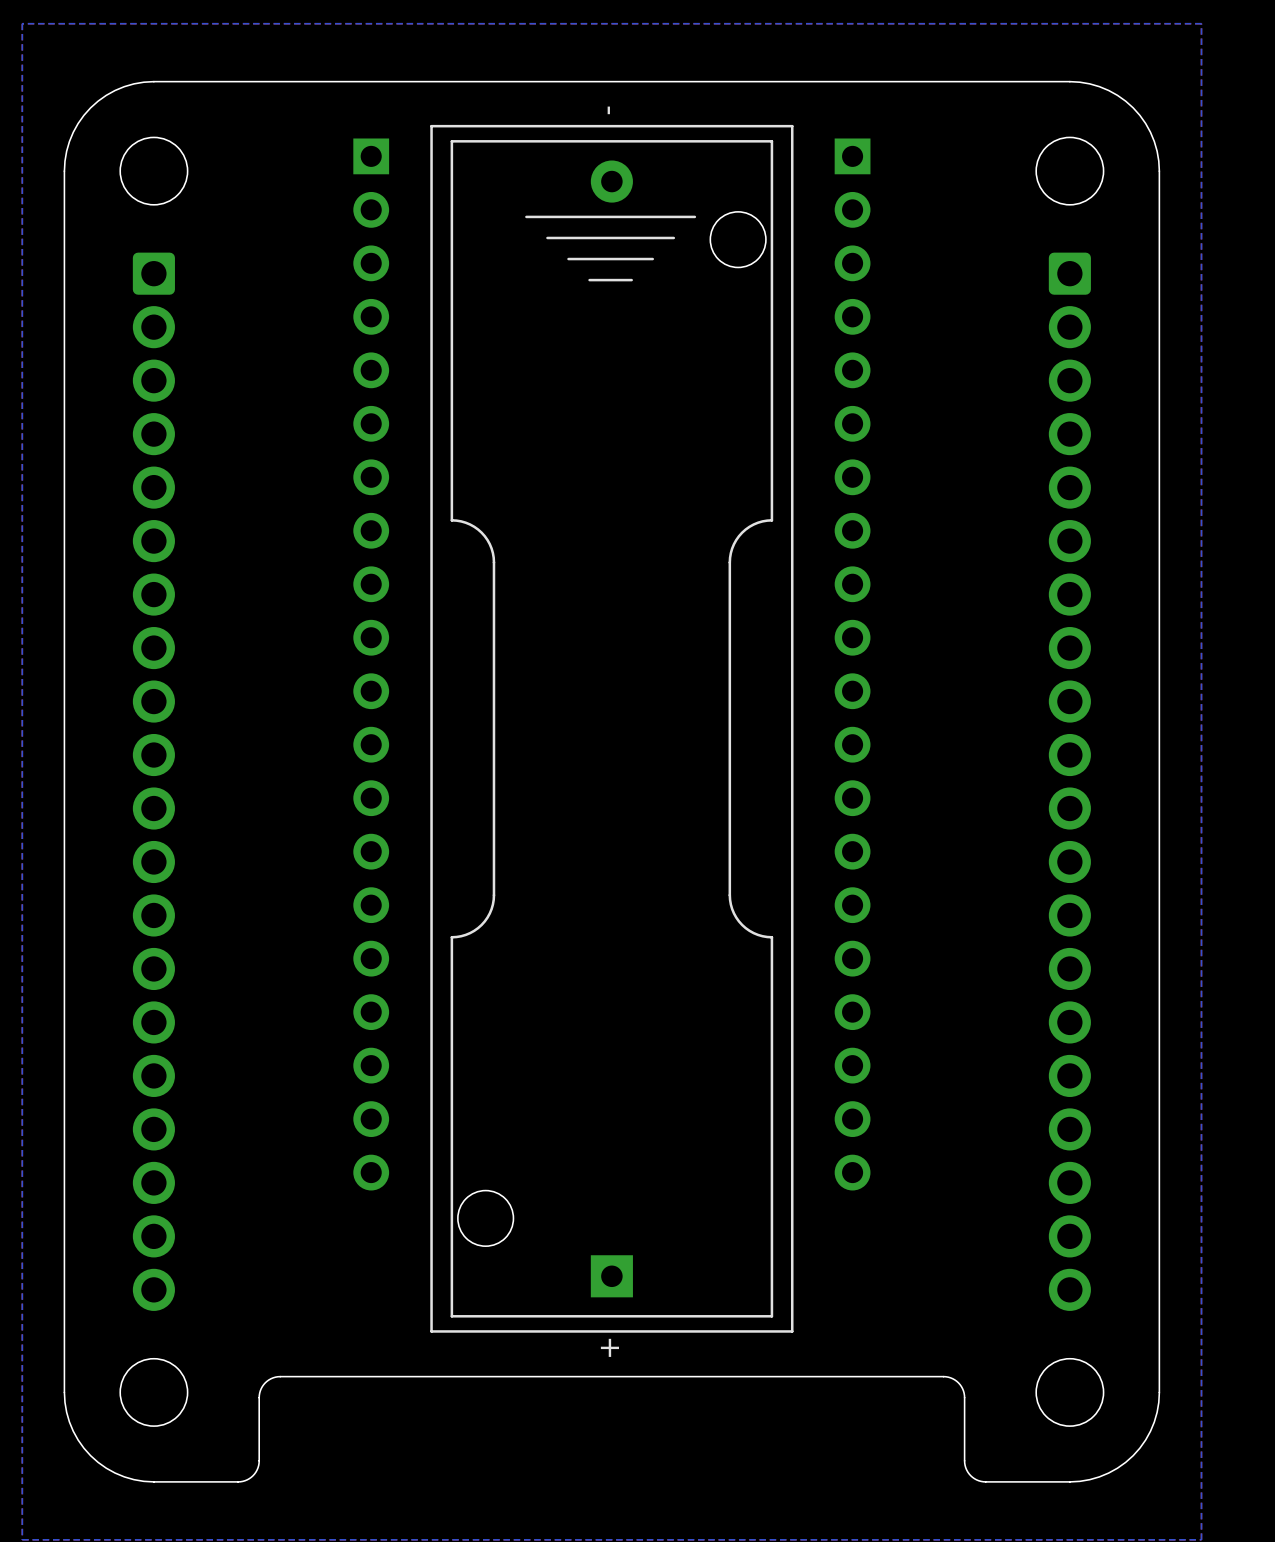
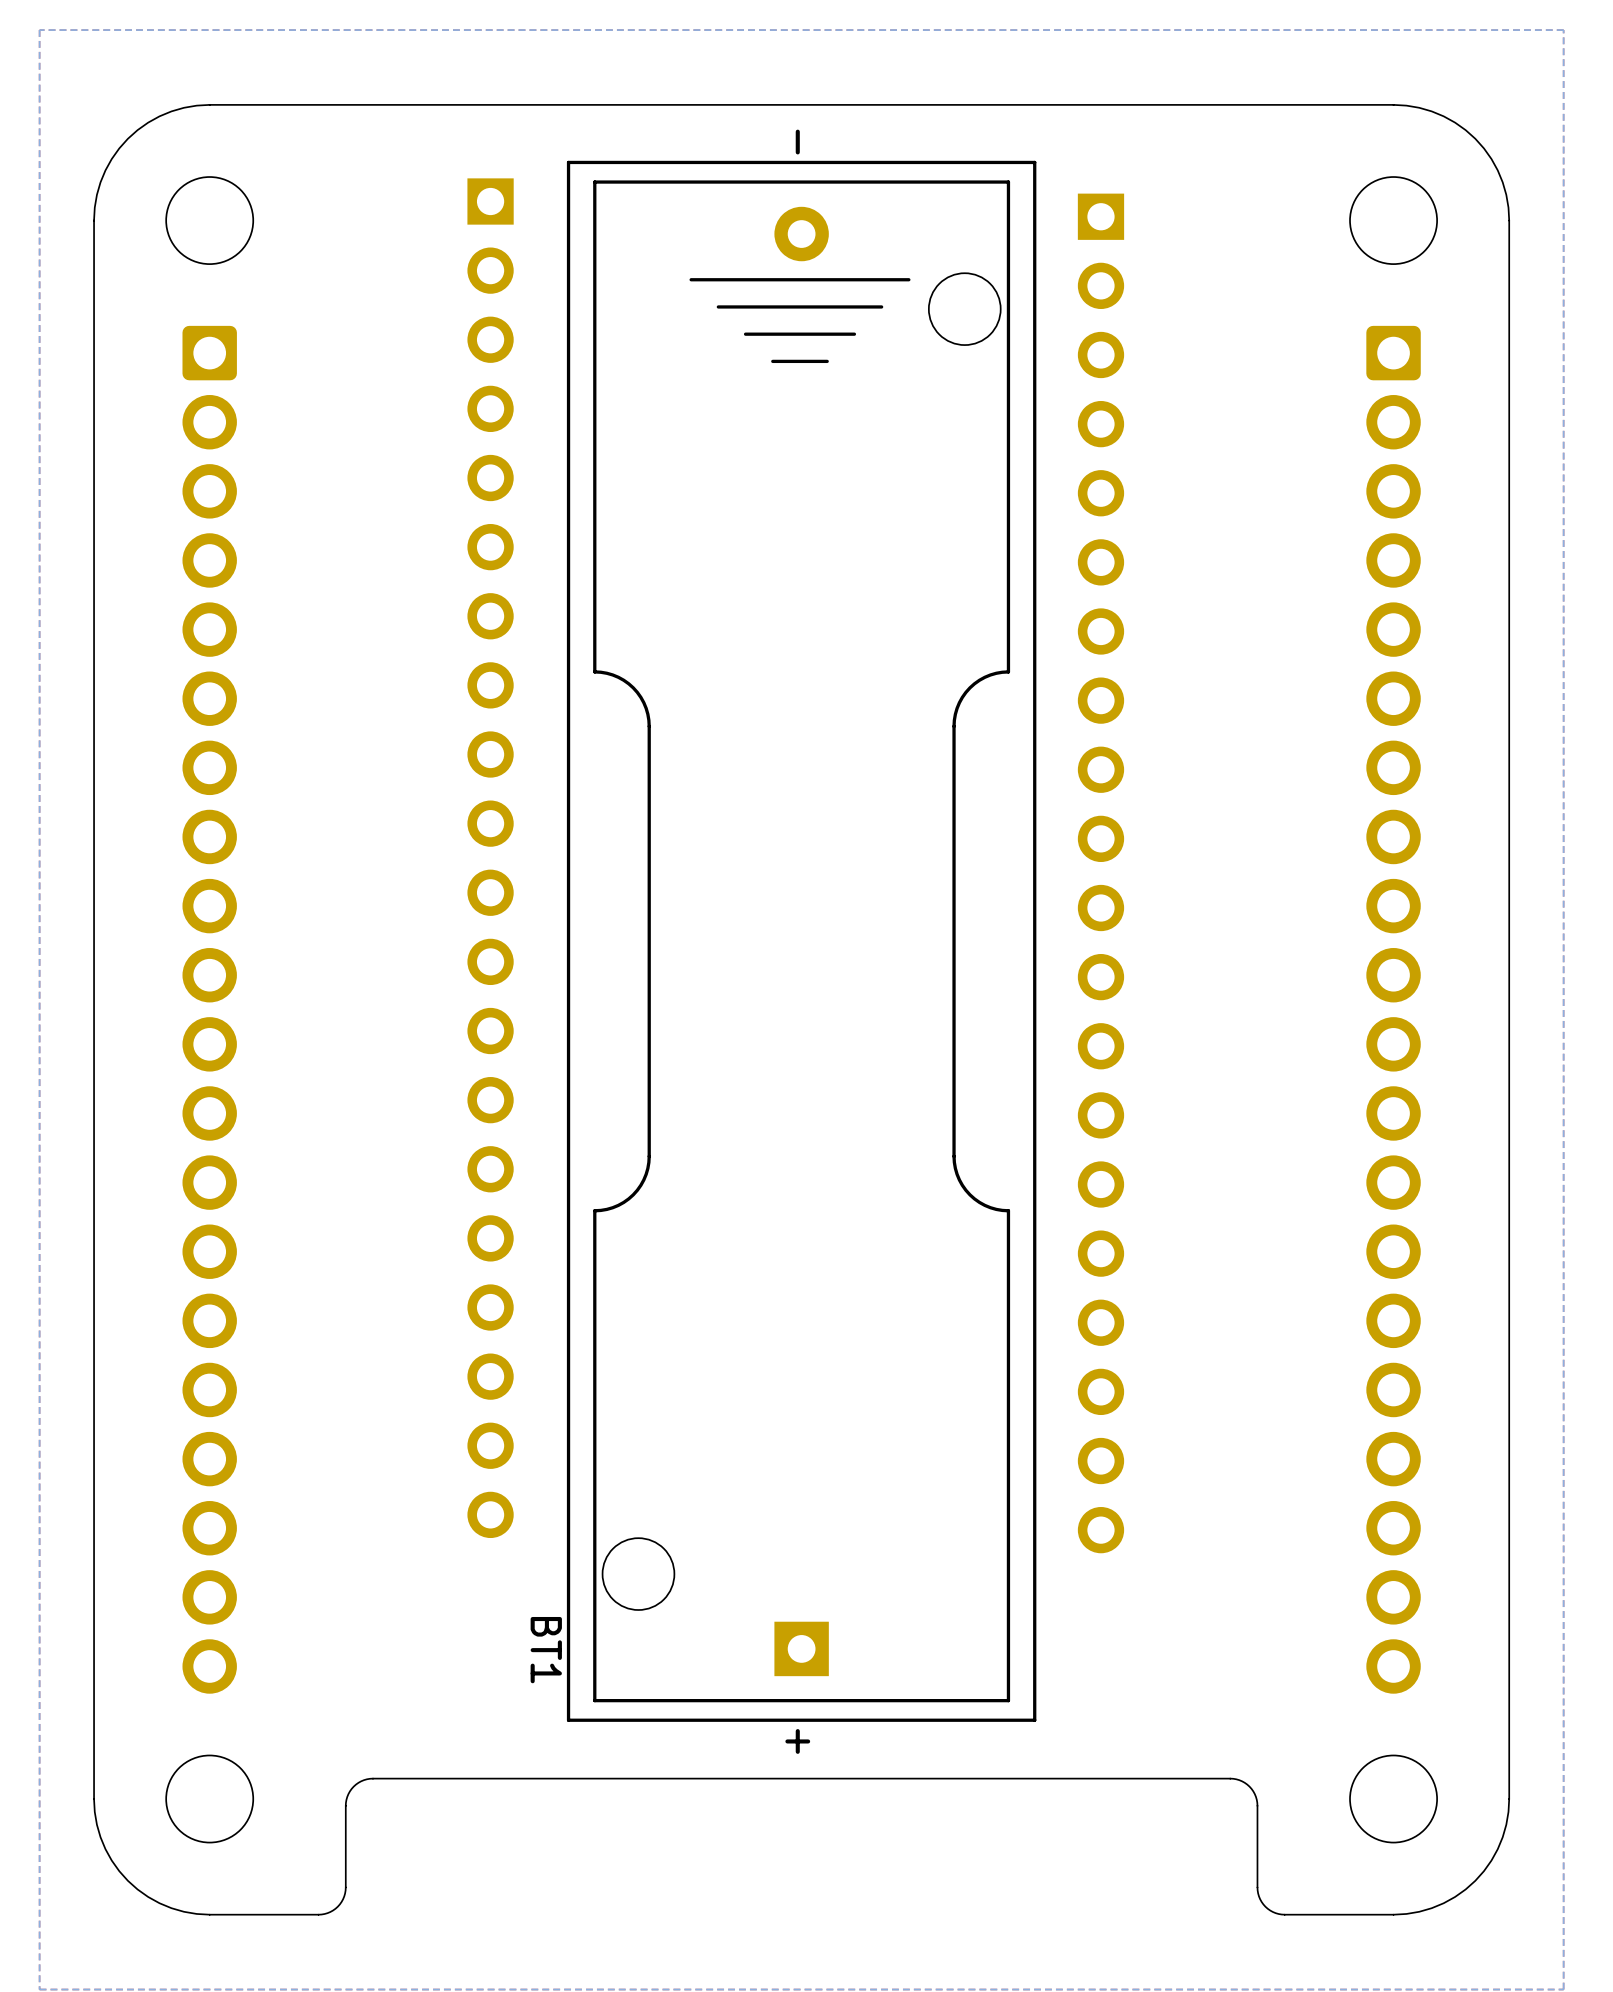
part position: (852, 664) -> (1100, 873)
BT1 name: none -> BT1 (546, 1650)

